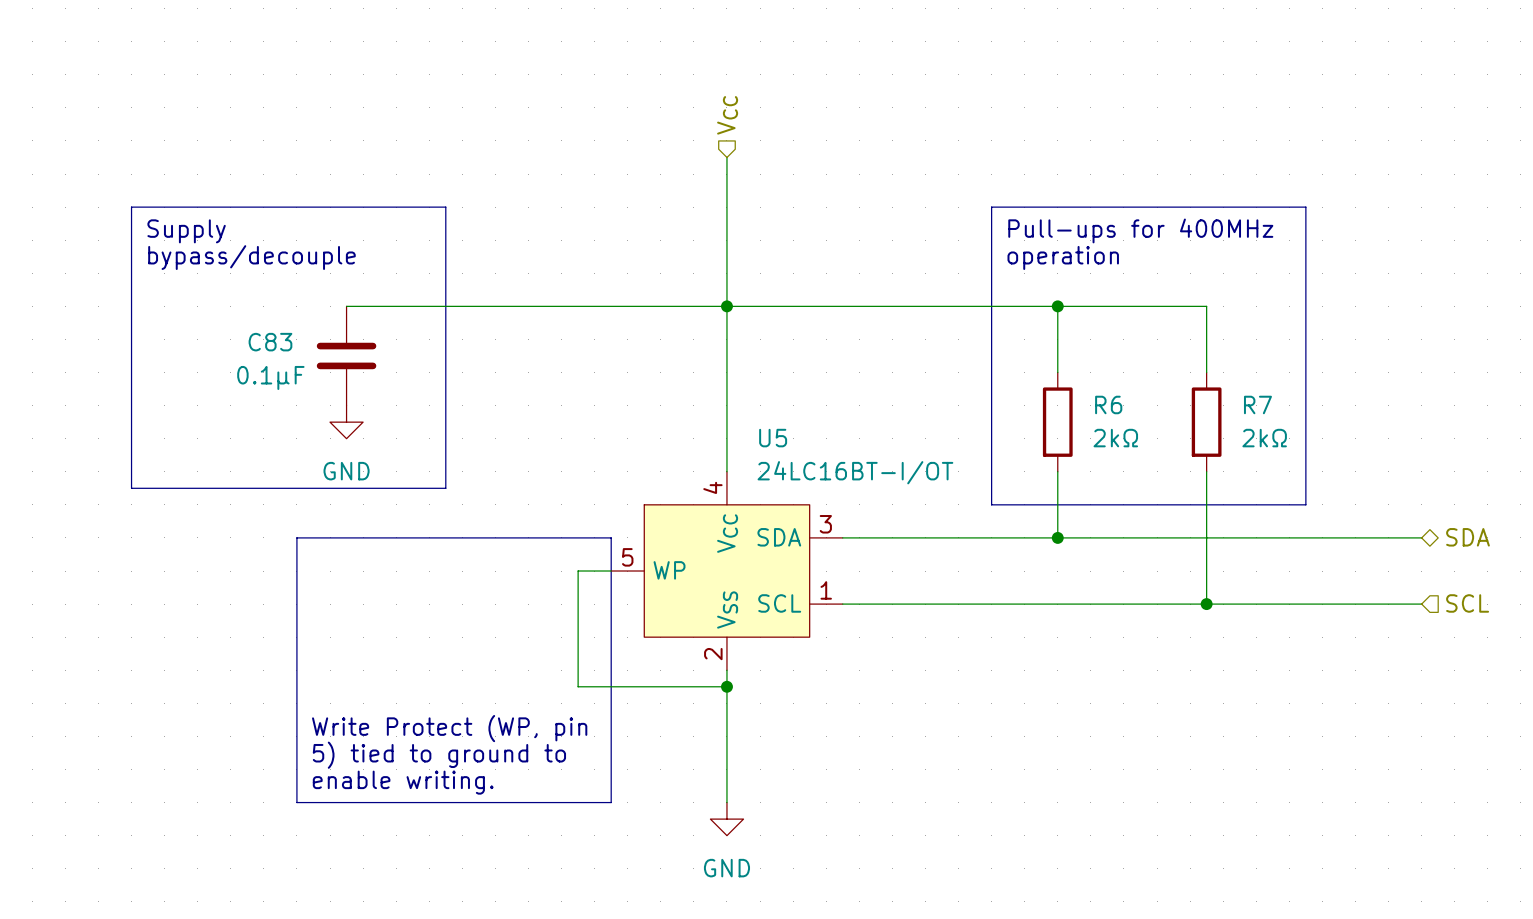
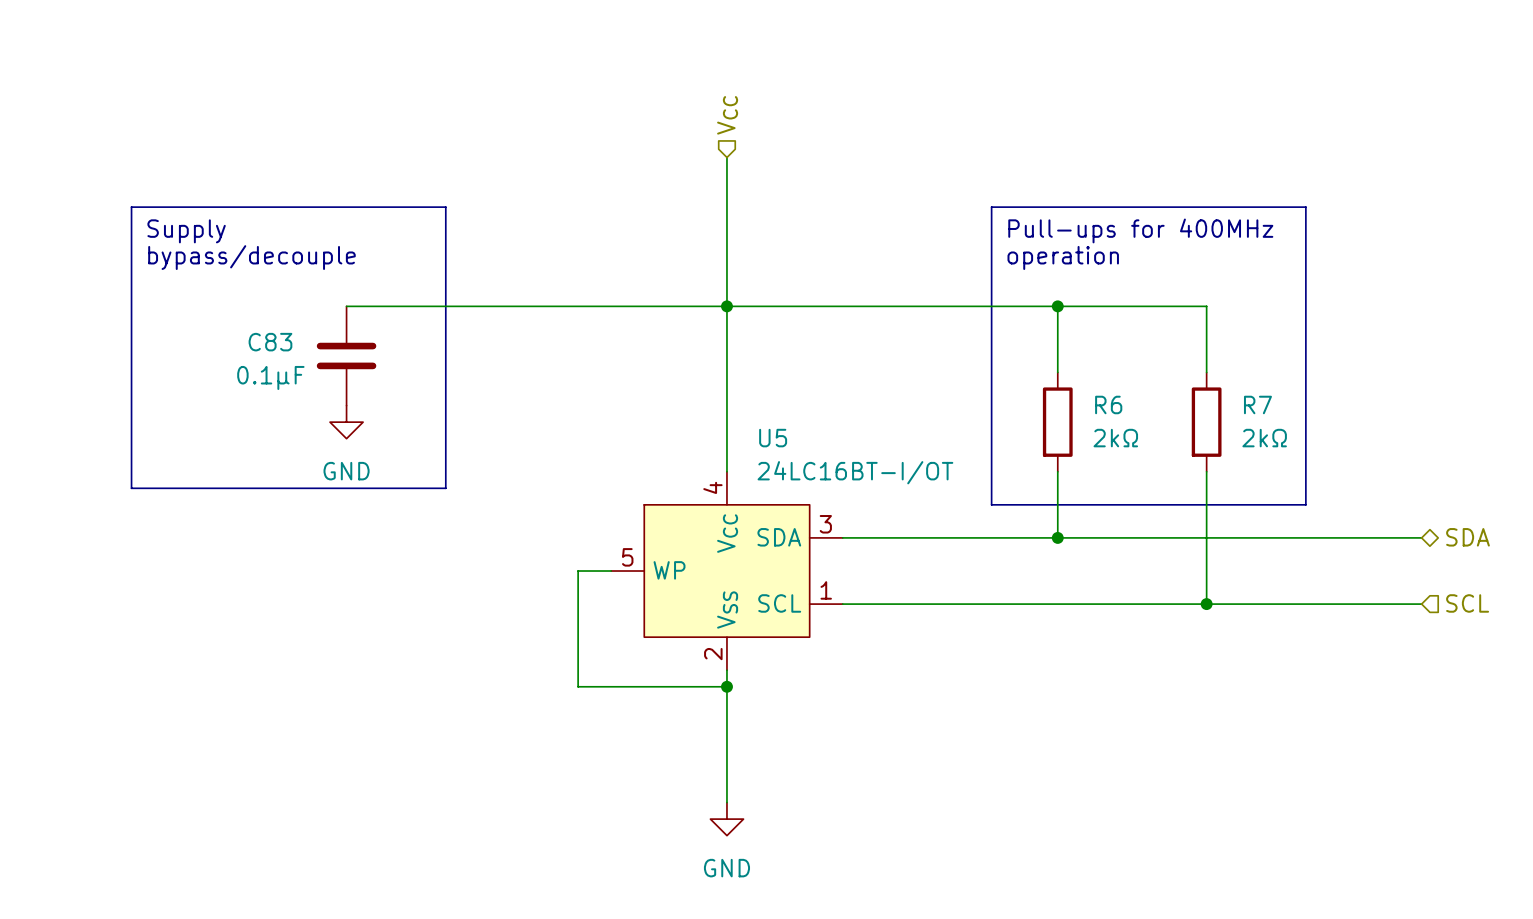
line: (296, 537) (611, 537) (611, 802) (296, 802) (296, 537) -> none
text: Write Protect (WP, pin (449, 728) -> none
text: 5) tied to ground to (439, 755) -> none
text: enable writing. (403, 782) -> none

